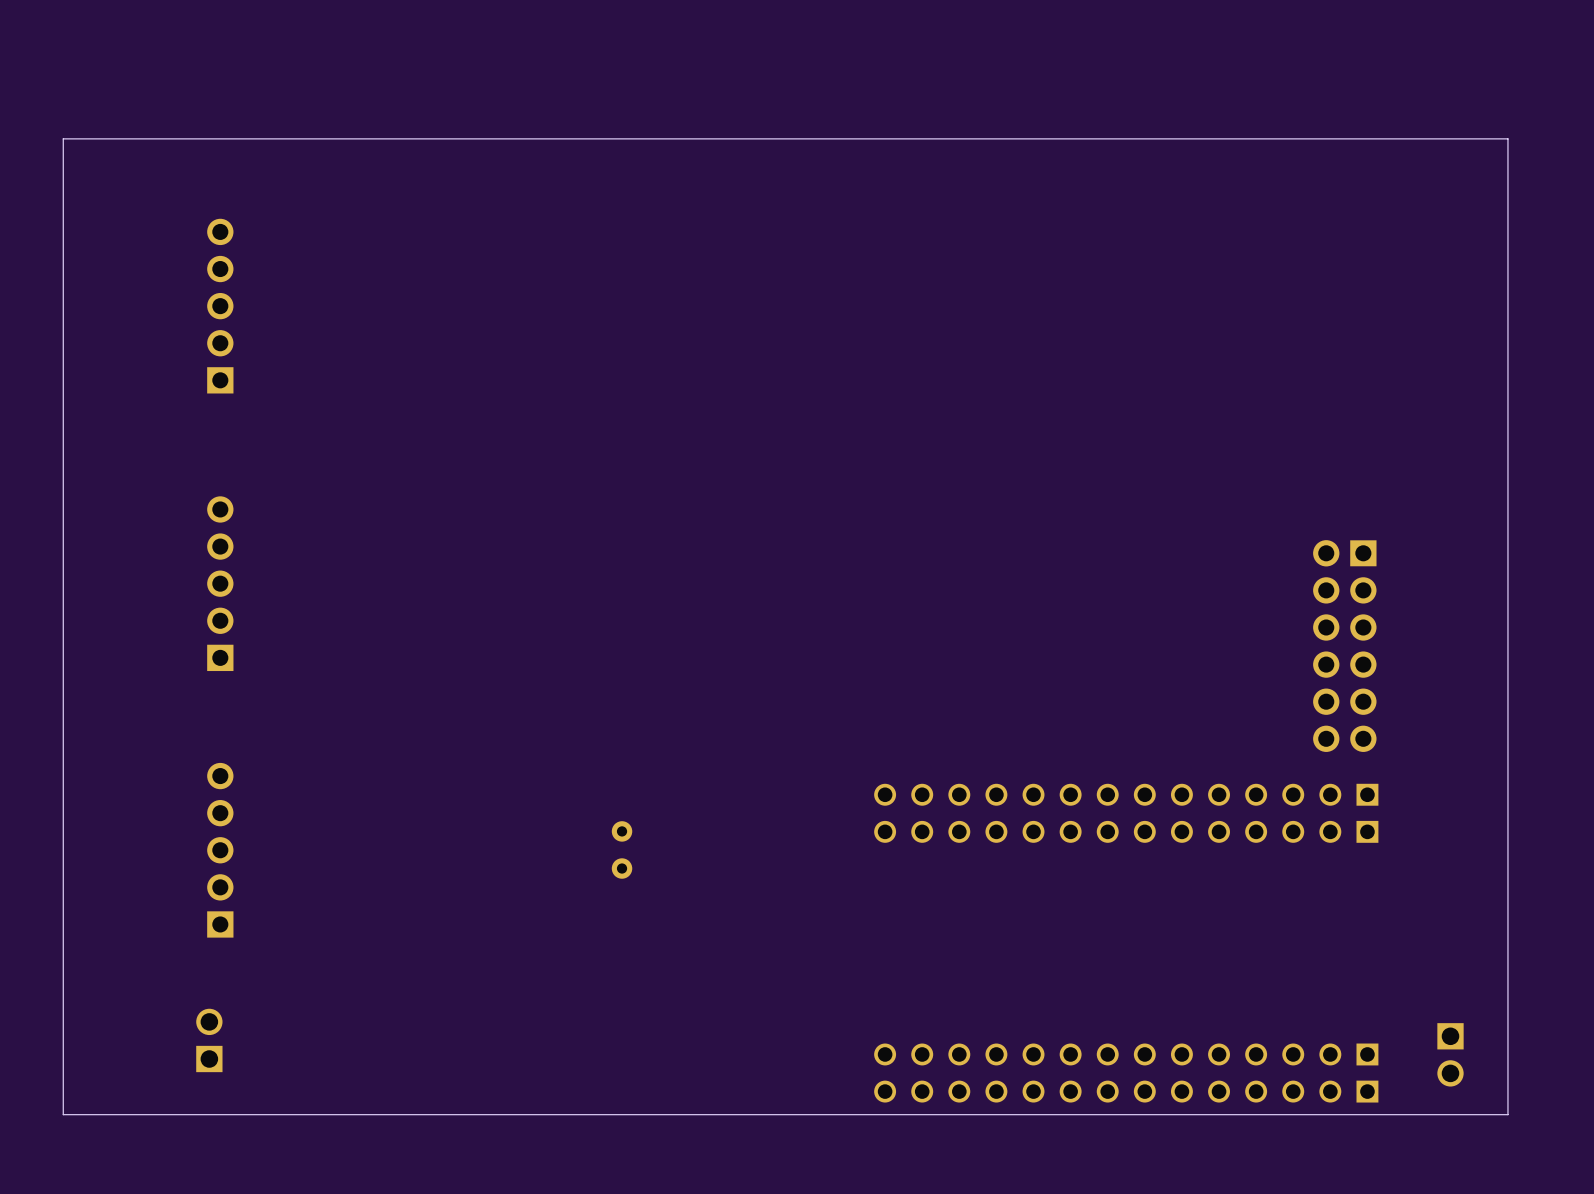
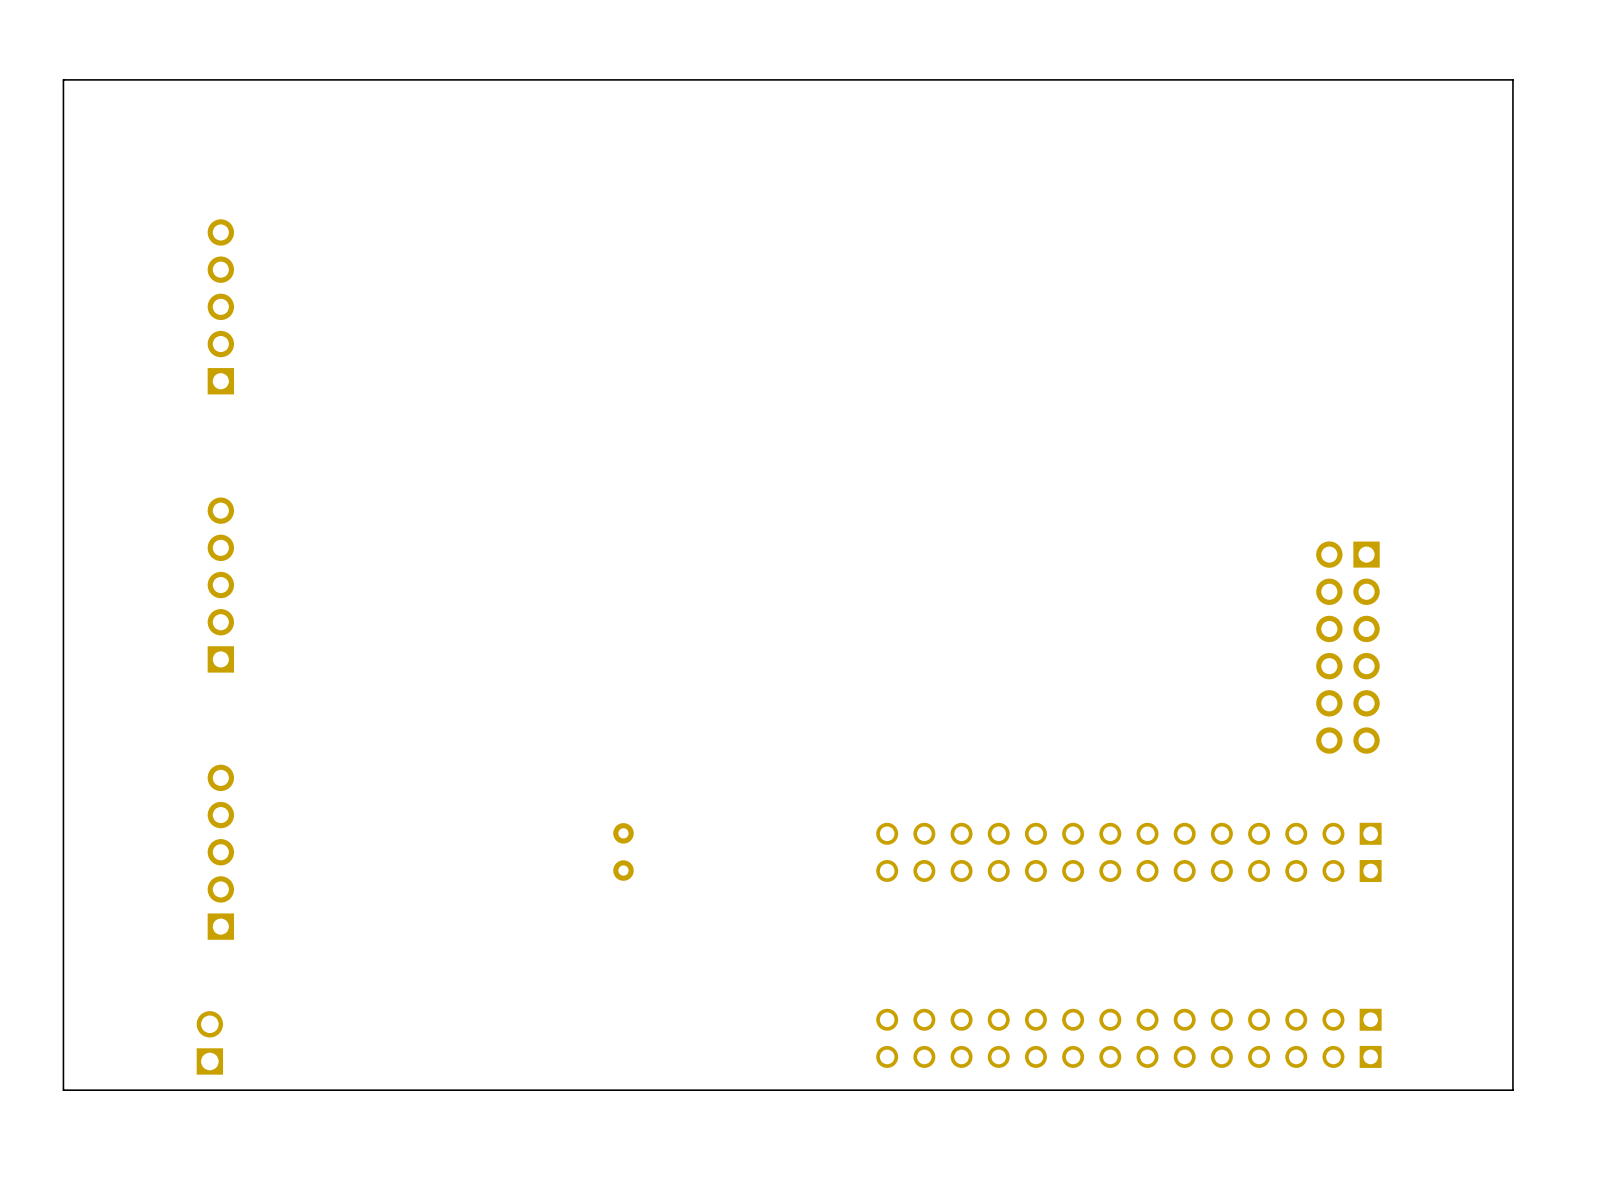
board edge: (63, 138) (1507, 138) (1507, 1114) (63, 1114) (63, 1087) -> (63, 139) (63, 79) (1512, 79) (1512, 1090) (63, 1090)
part position: (1126, 794) -> (1128, 870)
part: (1450, 1054) -> none
part position: (1126, 1091) -> (1128, 1019)

